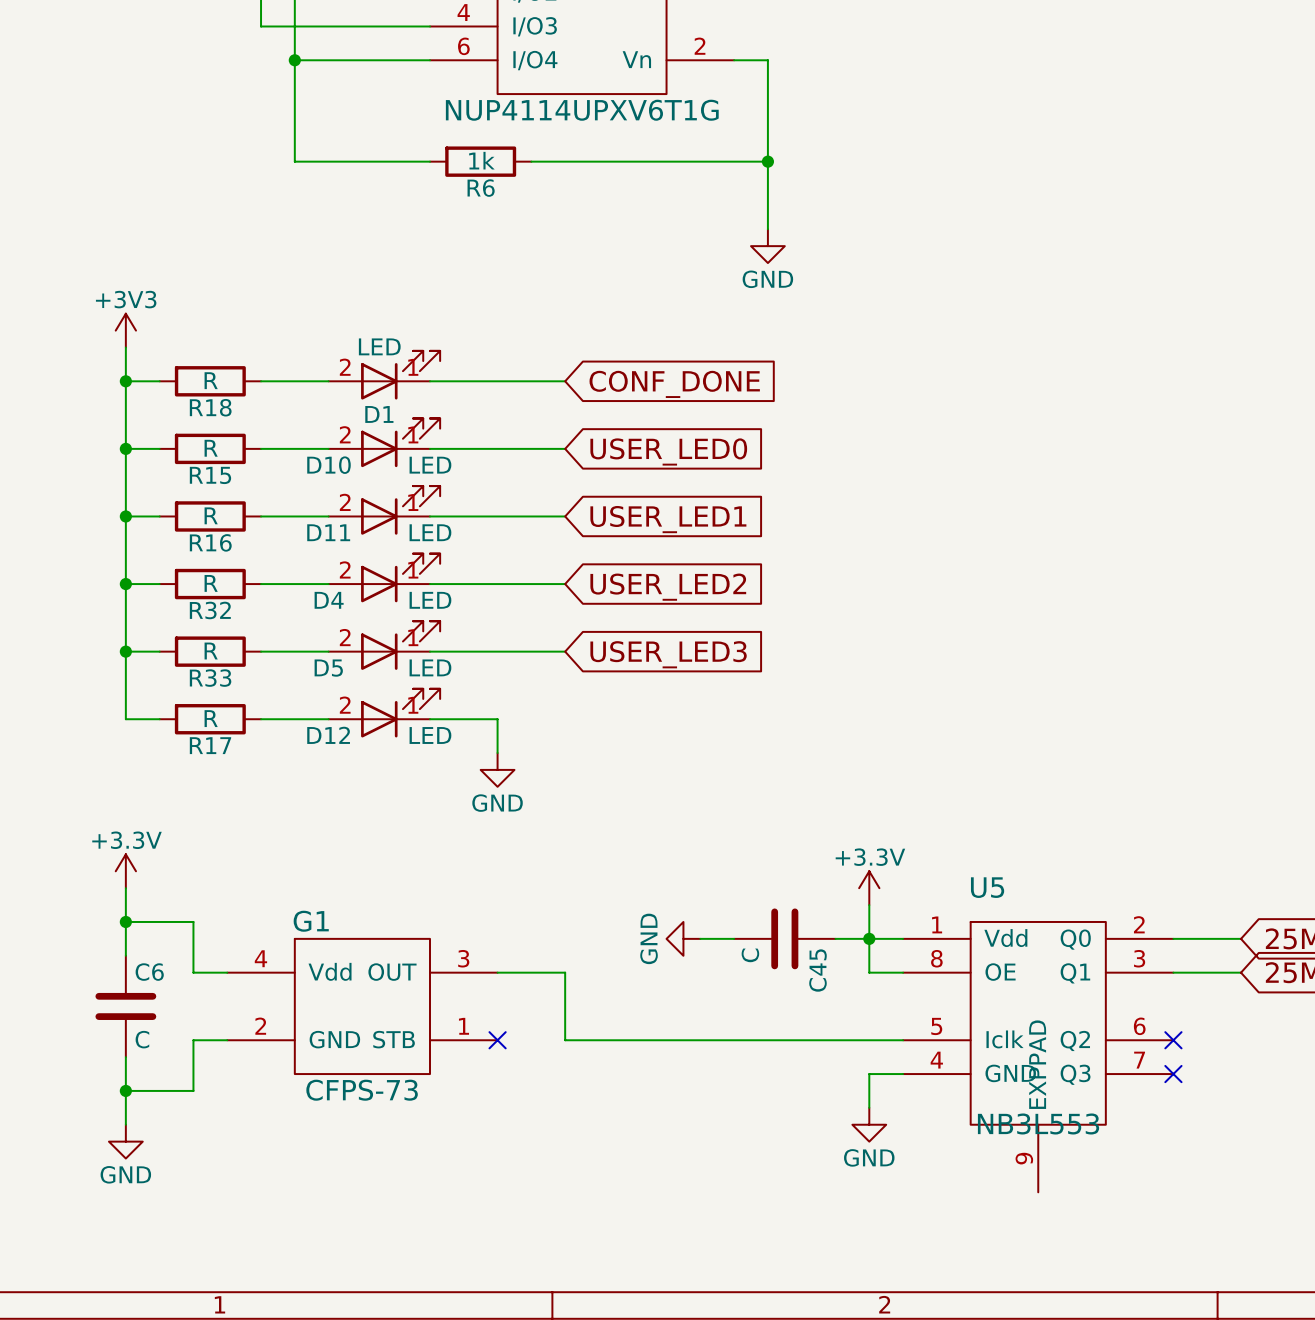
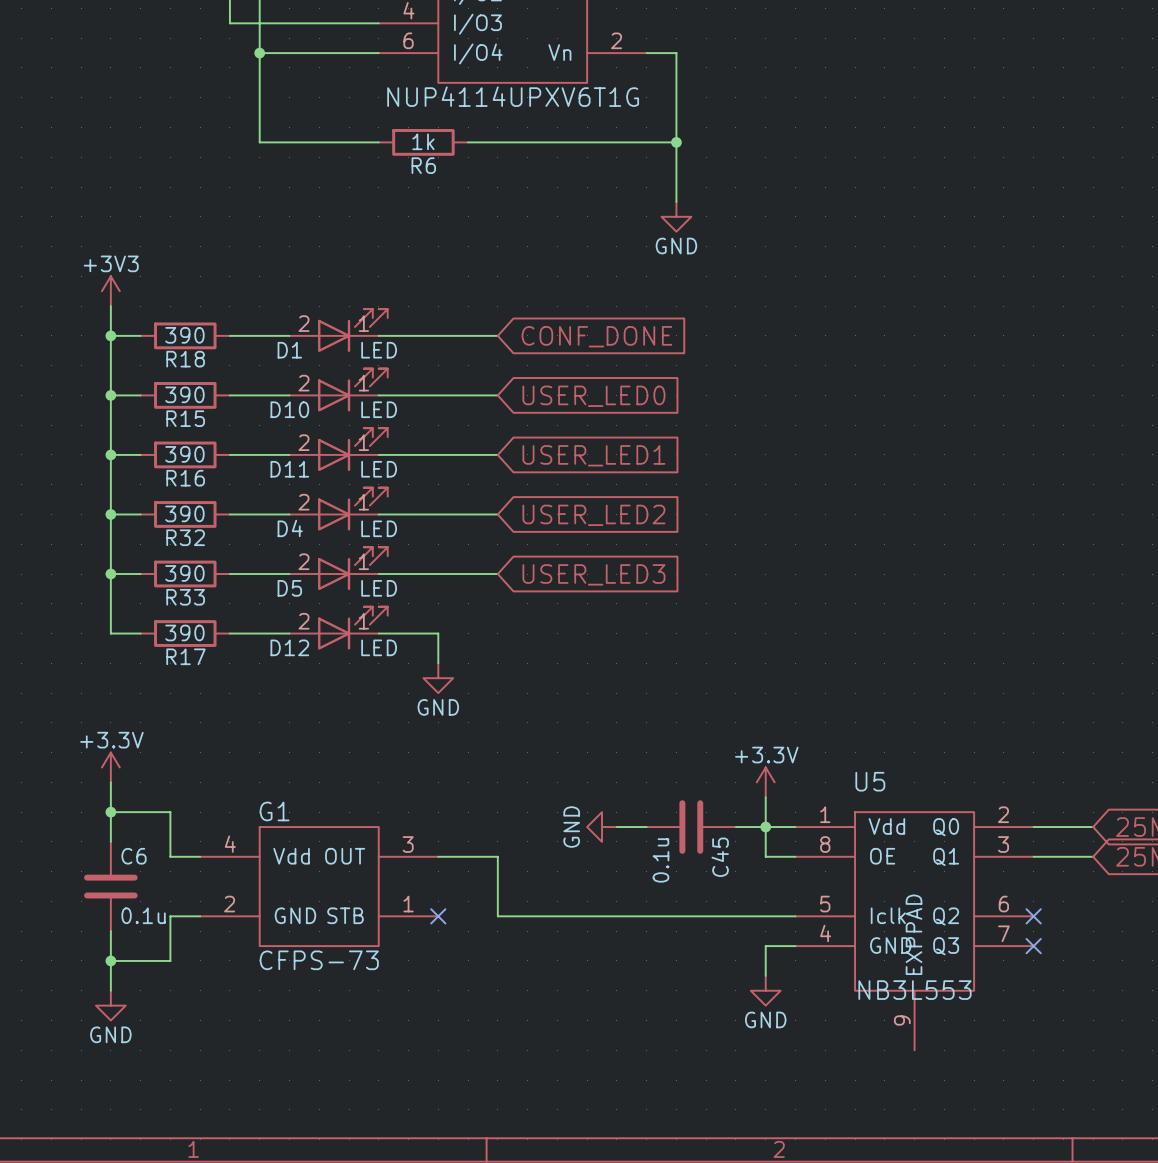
D1 value position: LED (379, 346) -> LED (379, 350)
R18 value: R (211, 380) -> 390 (184, 335)
D1 name position: D1 (379, 414) -> D1 (289, 350)
R15 value: R (211, 448) -> 390 (184, 394)
R16 value: R (211, 515) -> 390 (184, 454)
R32 value: R (211, 583) -> 390 (184, 513)
R33 value: R (211, 651) -> 390 (184, 573)
R17 value: R (211, 718) -> 390 (184, 632)
C45 value: C (750, 955) -> 0.1u (660, 860)
C6 value: C (142, 1039) -> 0.1u (143, 915)

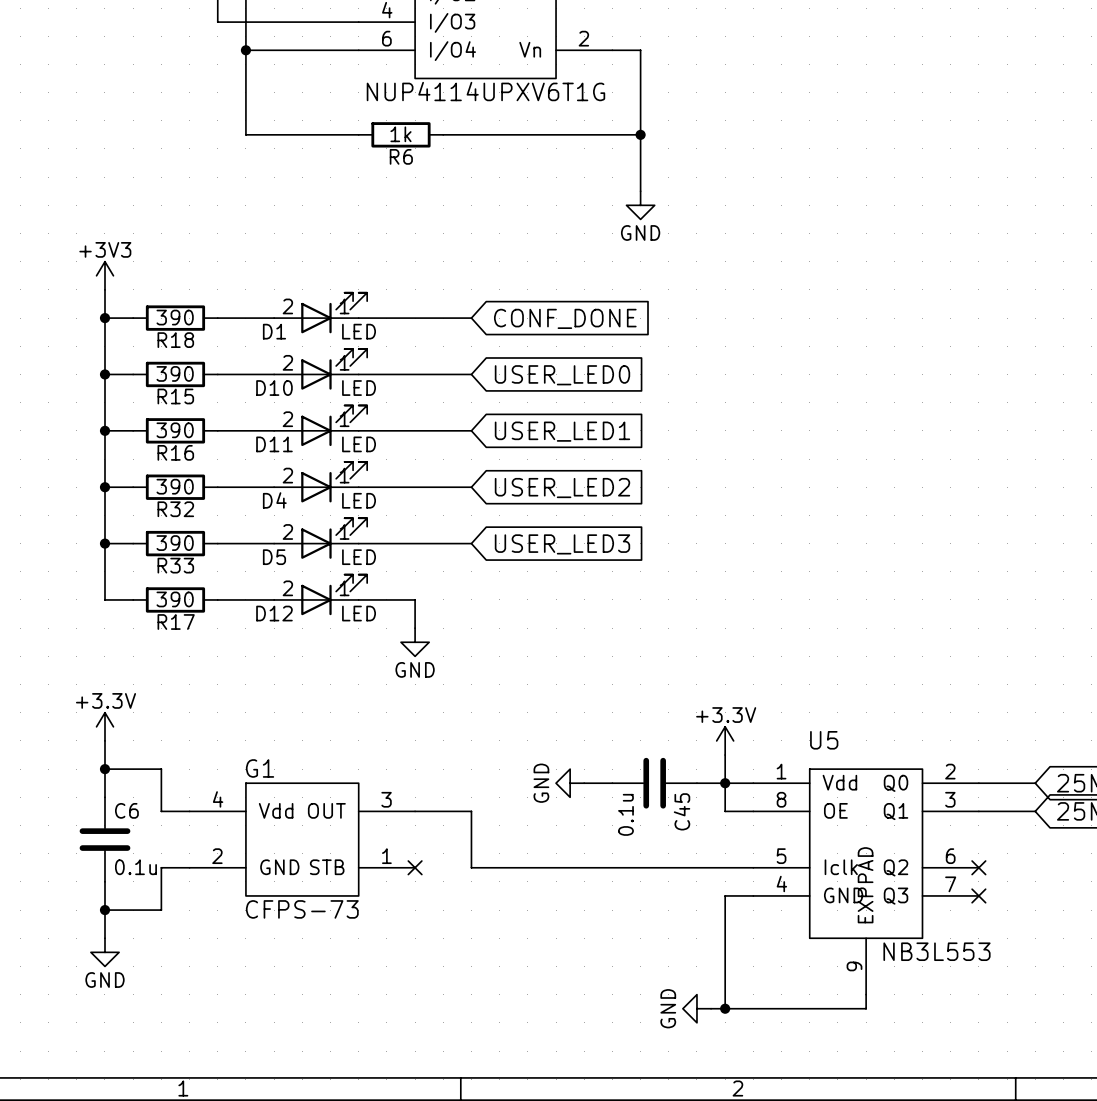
wire: none -> (725, 924) (725, 1008)
power symbol rotation: 0° (765, 990) -> 90° clockwise (696, 1008)
power symbol position: GND (765, 990) -> GND (696, 1008)
U5 value position: NB3L553 (914, 990) -> NB3L553 (936, 951)
wire: none -> (866, 994) (866, 1008) (711, 1008)
junction: none -> (725, 1008)

